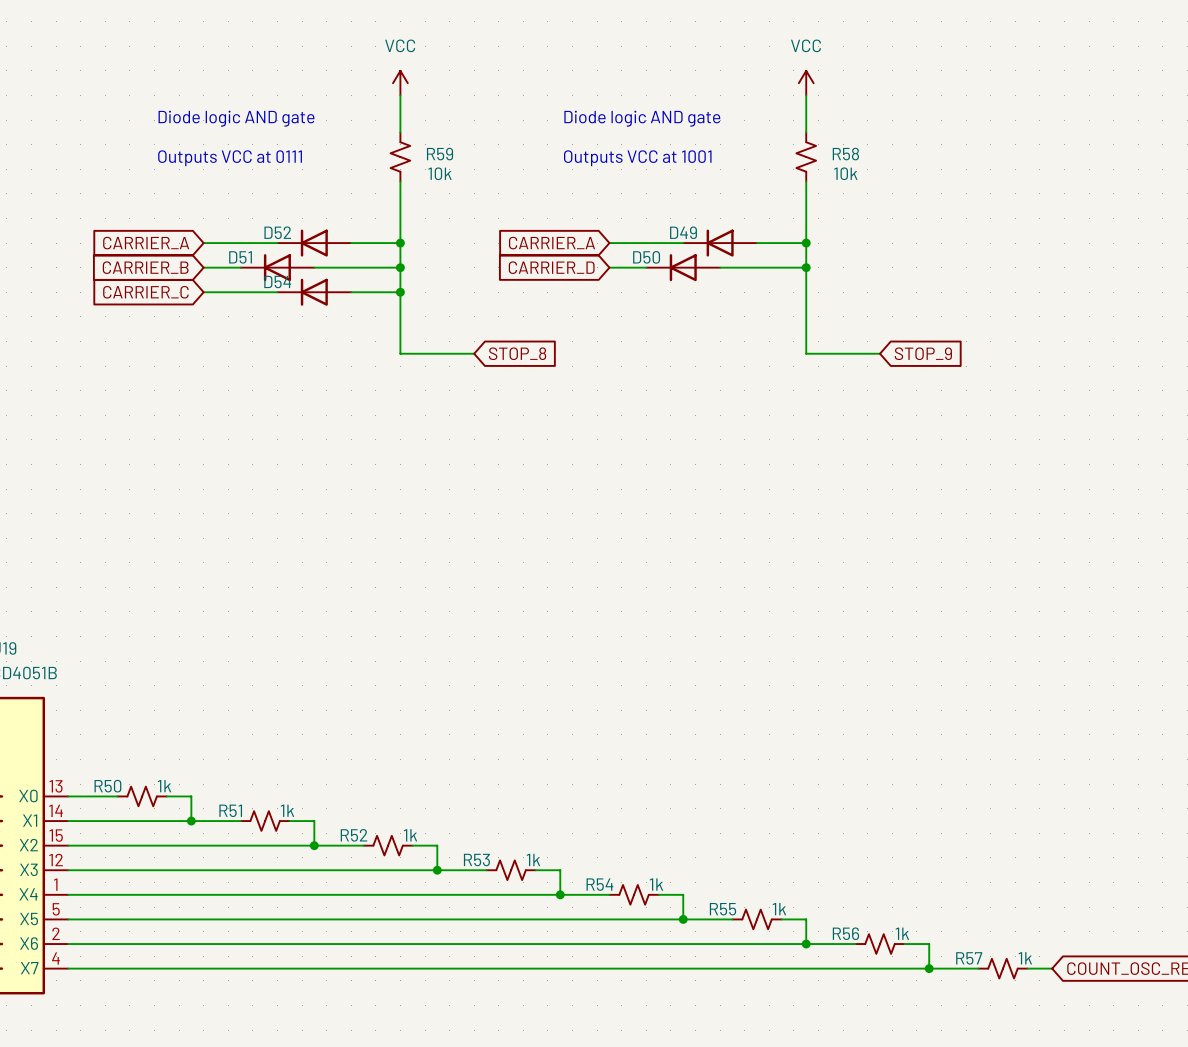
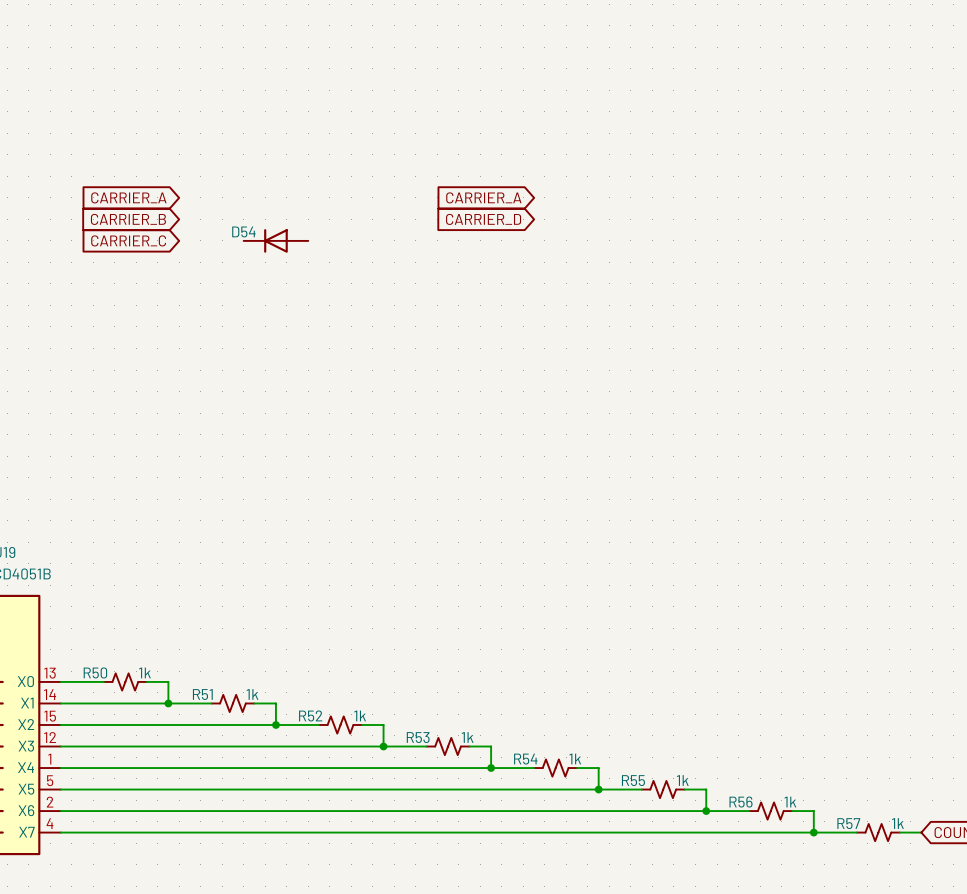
power symbol: VCC (400, 83) -> none
power symbol: VCC (806, 83) -> none
wire: (400, 95) (400, 132) -> none
wire: (806, 95) (806, 132) -> none
text: Diode logic AND gate (236, 118) -> none
text: Diode logic AND gate (642, 118) -> none
R59: 10k (400, 156) -> none
R58: 10k (806, 156) -> none
text: Outputs VCC at 0111 (230, 158) -> none
text: Outputs VCC at 1001 (637, 158) -> none
wire: (400, 181) (400, 353) (474, 353) -> none
wire: (806, 181) (806, 353) (880, 353) -> none
wire: (203, 243) (277, 243) -> none
D52: (314, 243) -> none
wire: (351, 243) (400, 243) -> none
junction: (400, 243) -> none
wire: (609, 243) (683, 243) -> none
D49: (720, 243) -> none
wire: (757, 243) (806, 243) -> none
junction: (806, 243) -> none
wire: (203, 267) (240, 267) -> none
D51: (277, 267) -> none
wire: (314, 267) (400, 267) -> none
junction: (400, 267) -> none
wire: (609, 267) (646, 267) -> none
D50: (683, 267) -> none
wire: (720, 267) (806, 267) -> none
junction: (806, 267) -> none
wire: (203, 292) (277, 292) -> none
wire: (351, 292) (400, 292) -> none
junction: (400, 292) -> none
global label: STOP_8 (517, 353) -> none
global label: STOP_9 (923, 353) -> none

